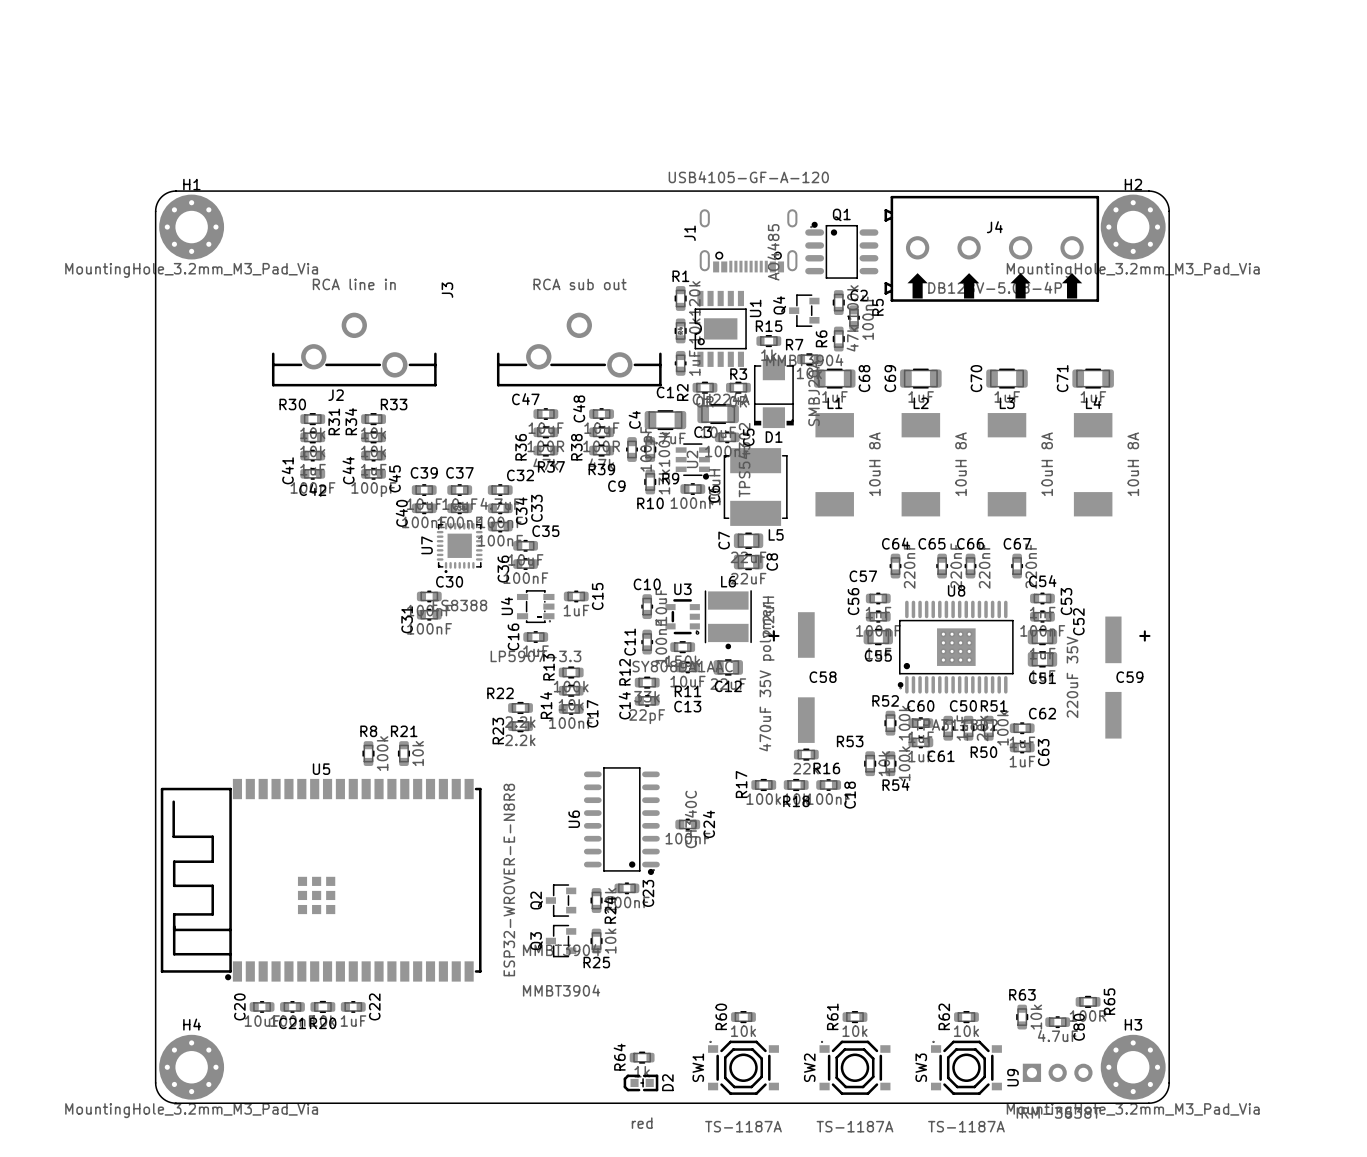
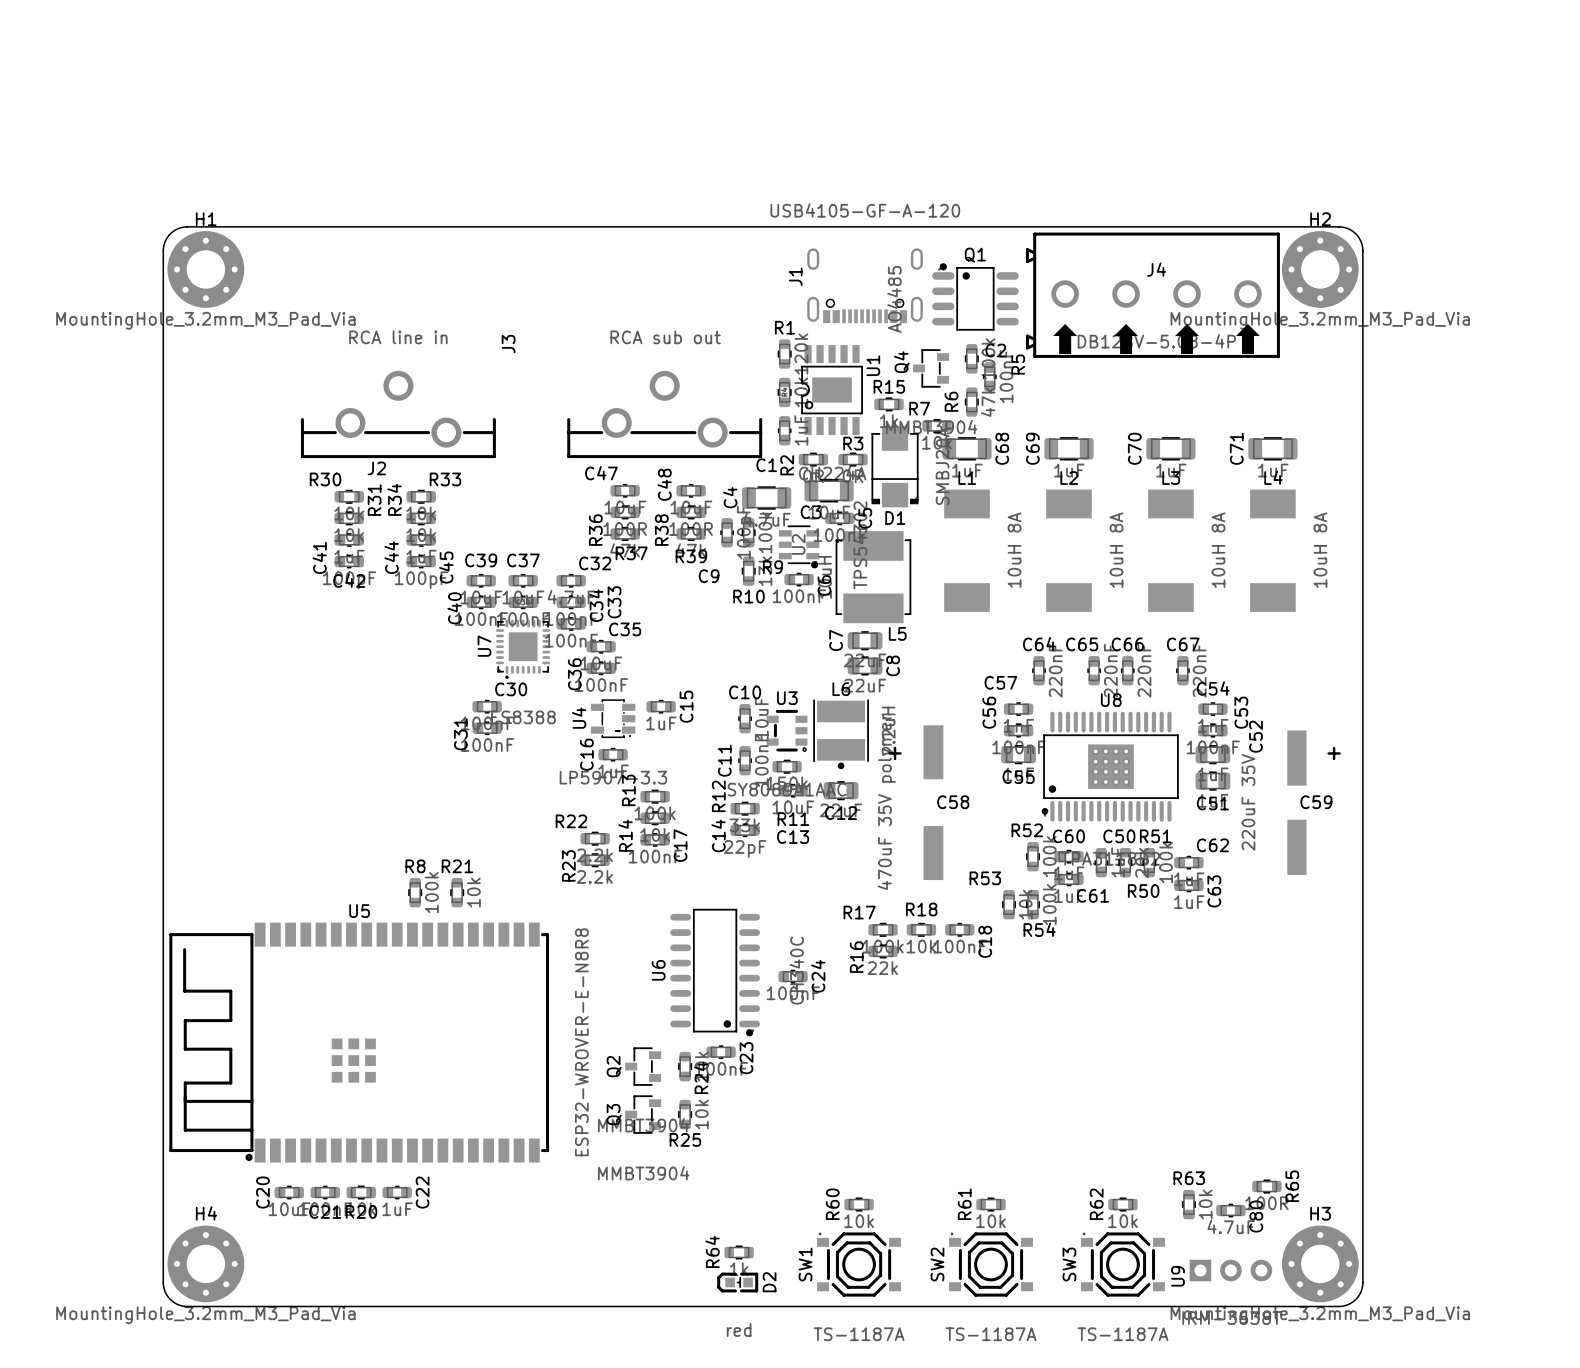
R16 position: (806, 754) -> (883, 951)
R16 name rotation: 0° (826, 768) -> 90° counterclockwise (856, 957)
R16 name position: R16 (826, 768) -> R16 (856, 957)
R17 name rotation: 0° (741, 784) -> 90° clockwise (859, 912)
R18 name position: R18 (796, 801) -> R18 (921, 909)

